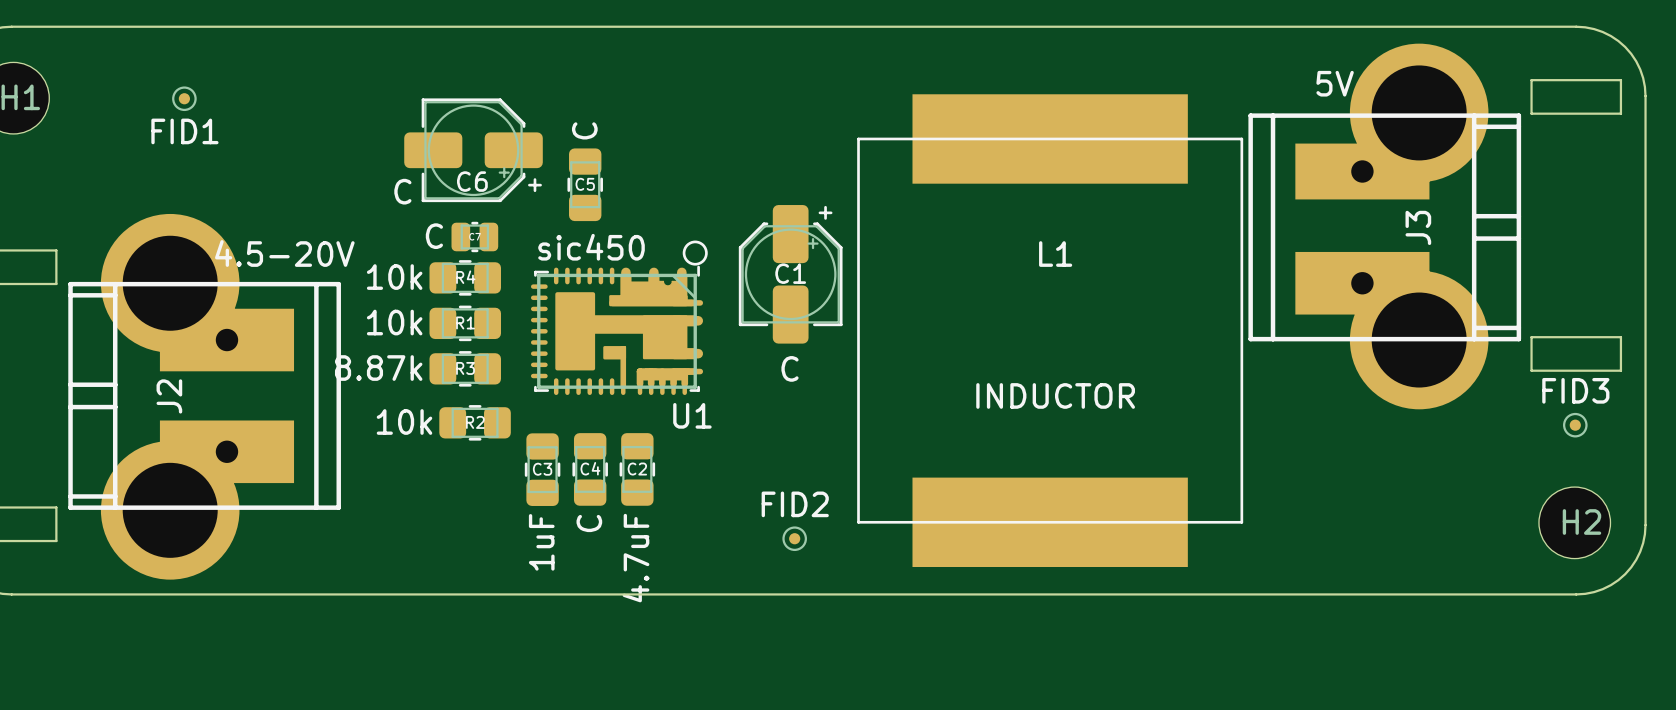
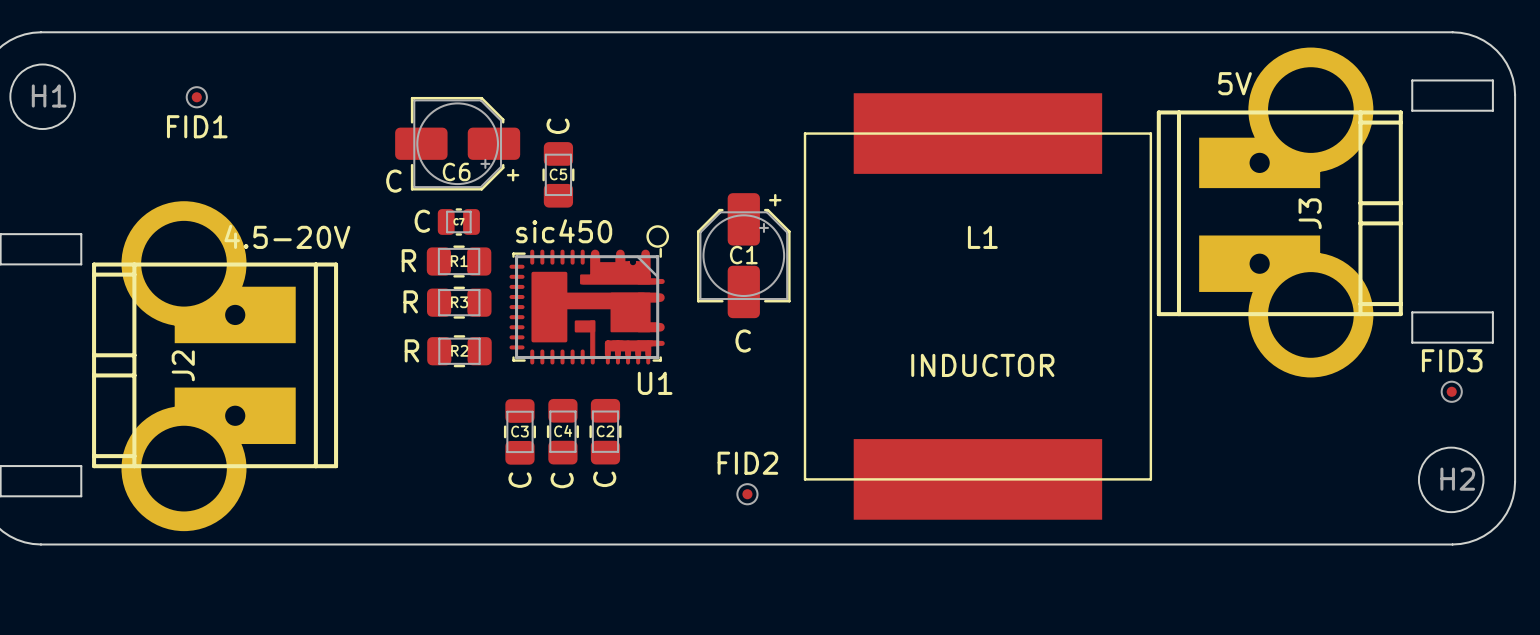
R4: 10k (465, 277) -> none
R1 value: 10k (394, 322) -> R (408, 260)
R1 position: (465, 323) -> (459, 261)
R3 value: 8.87k (378, 368) -> R (410, 301)
R3 position: (465, 368) -> (459, 302)
R2 value: 10k (404, 422) -> R (411, 350)
R2 position: (475, 422) -> (459, 351)
C3 value: 1uF (541, 542) -> C (520, 480)
C2 value: 4.7uF (635, 558) -> C (604, 479)

